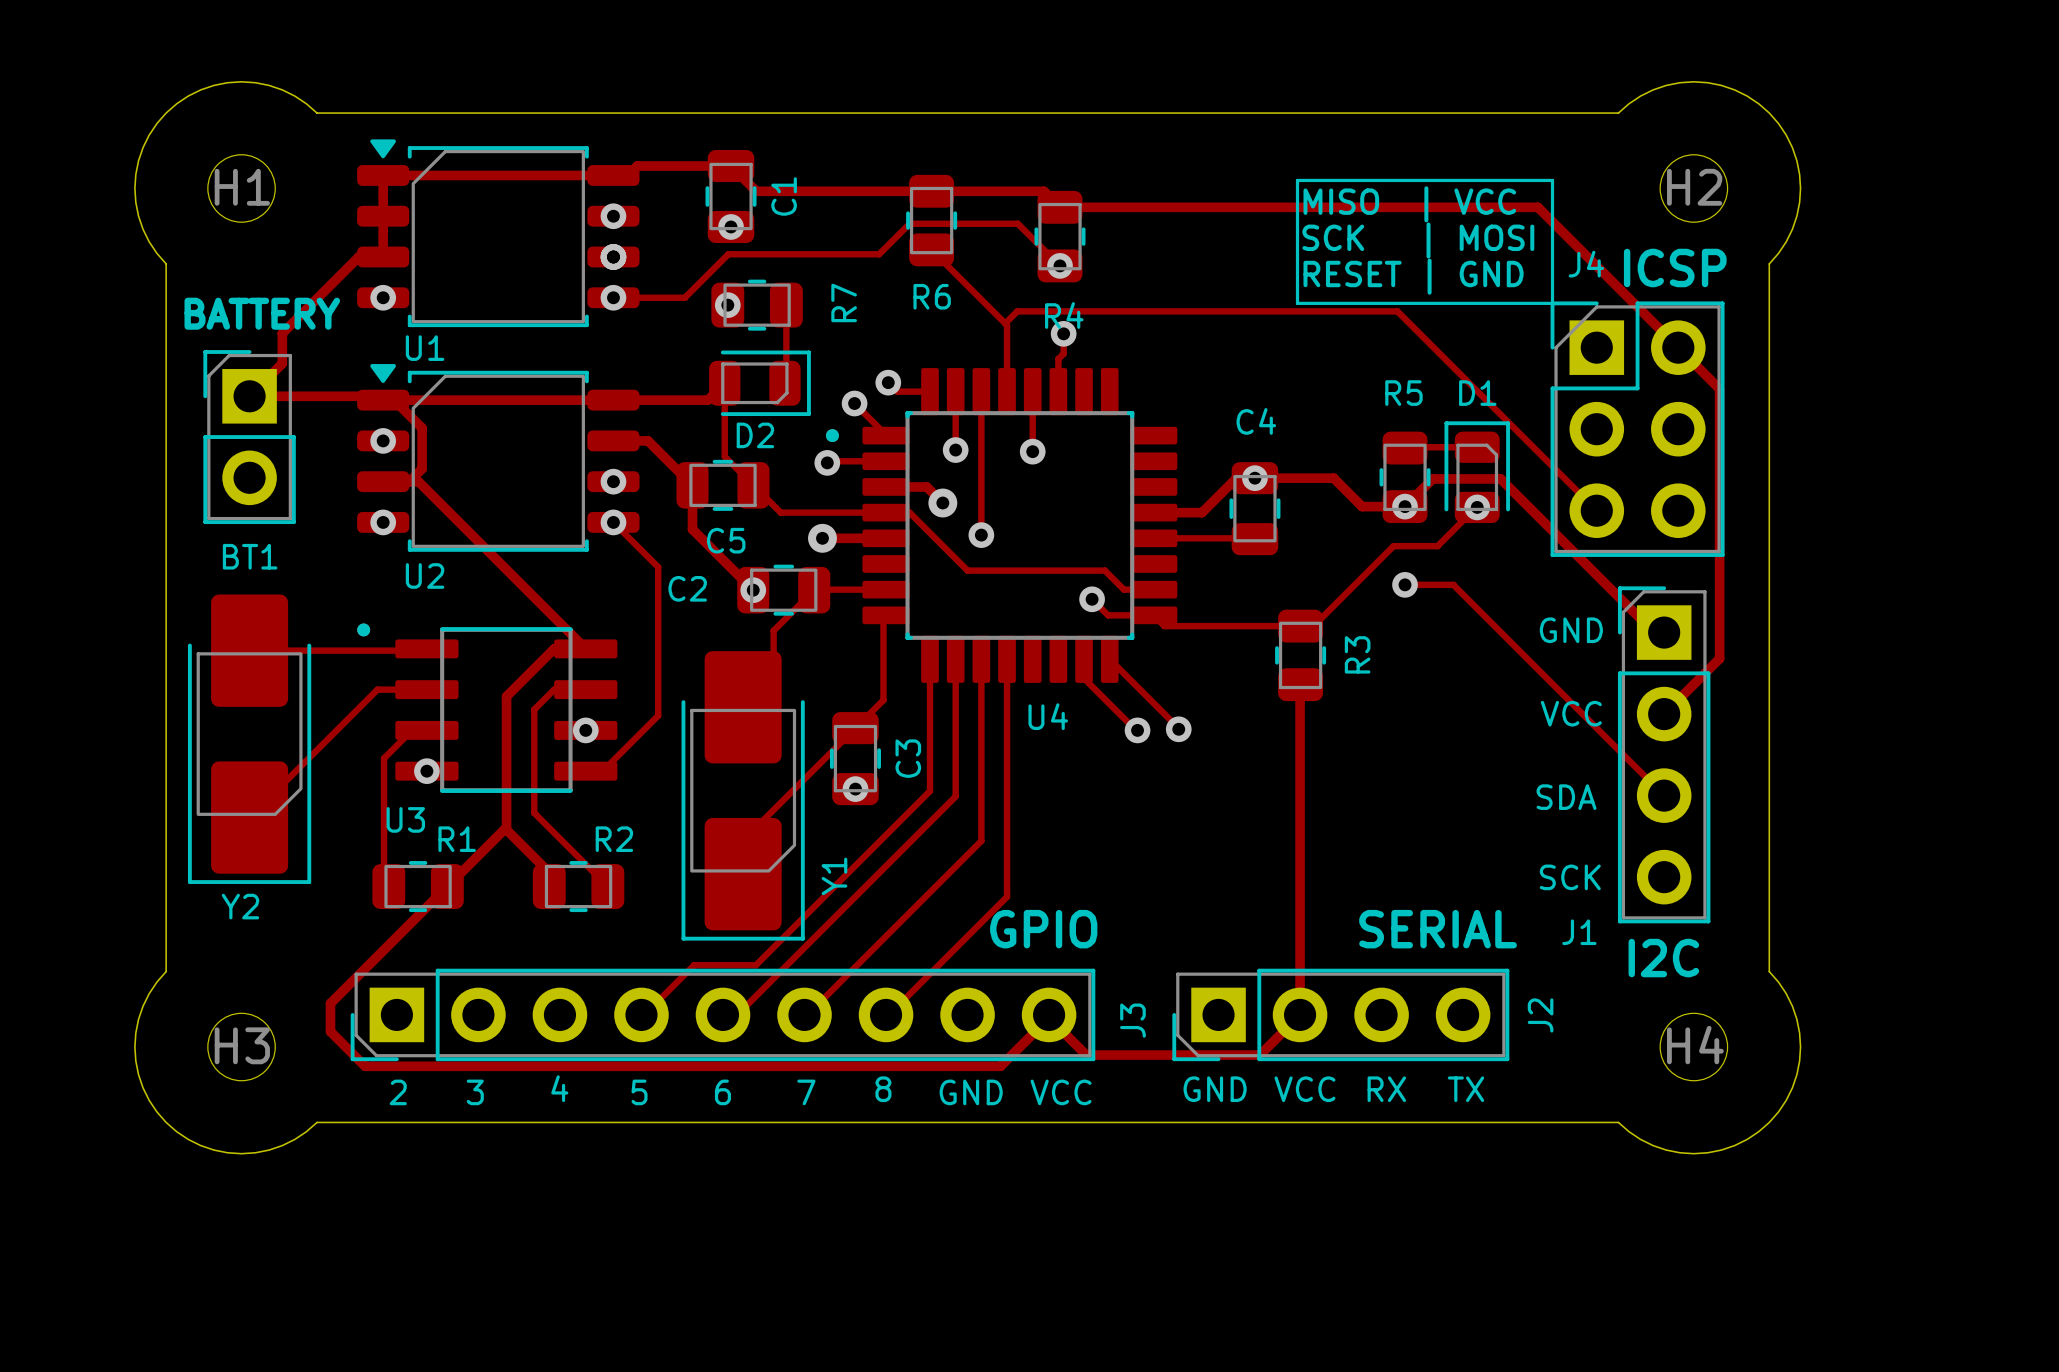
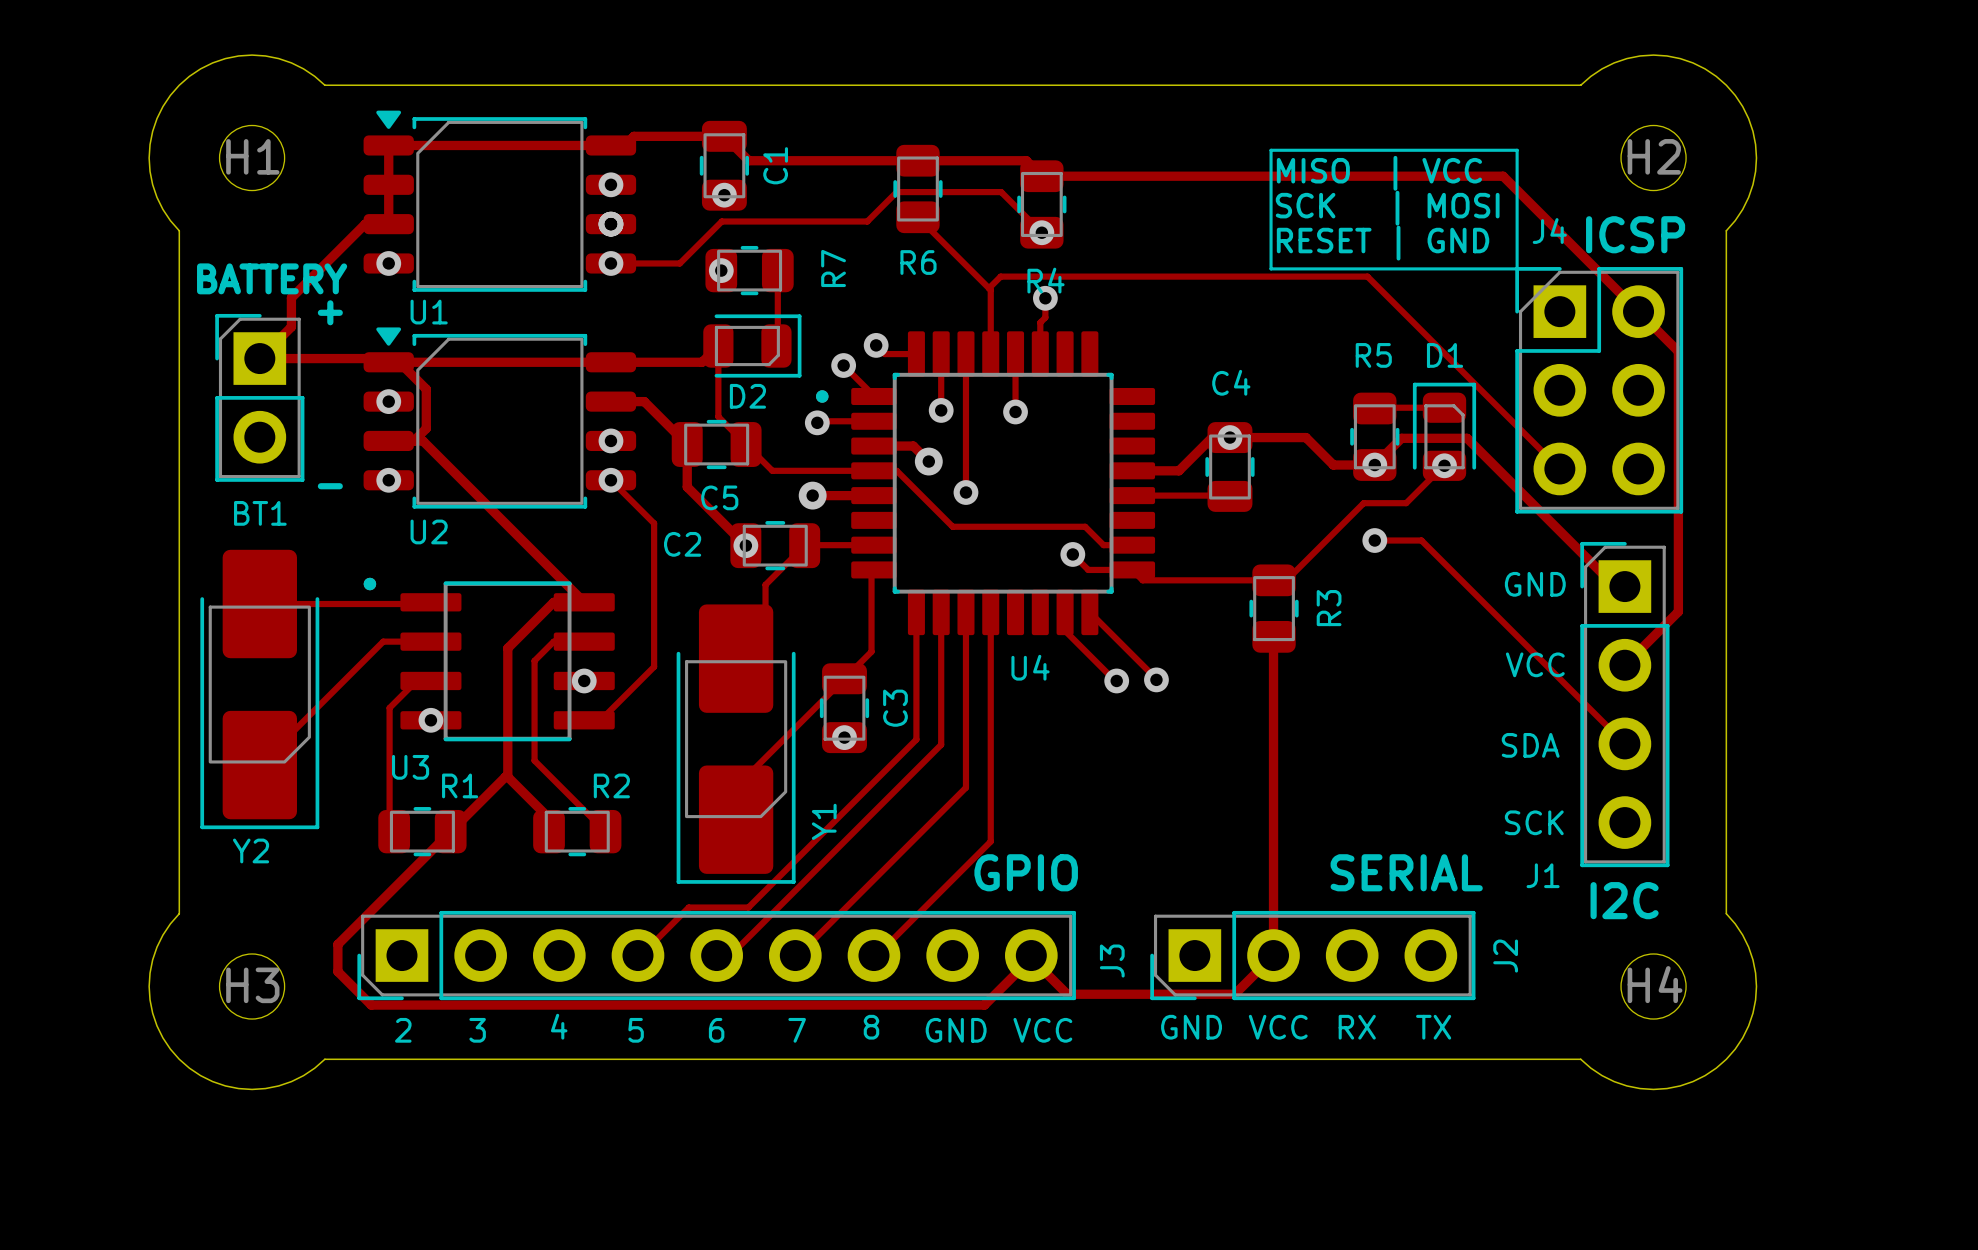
text: none -> + (330, 312)
text: none -> - (330, 486)

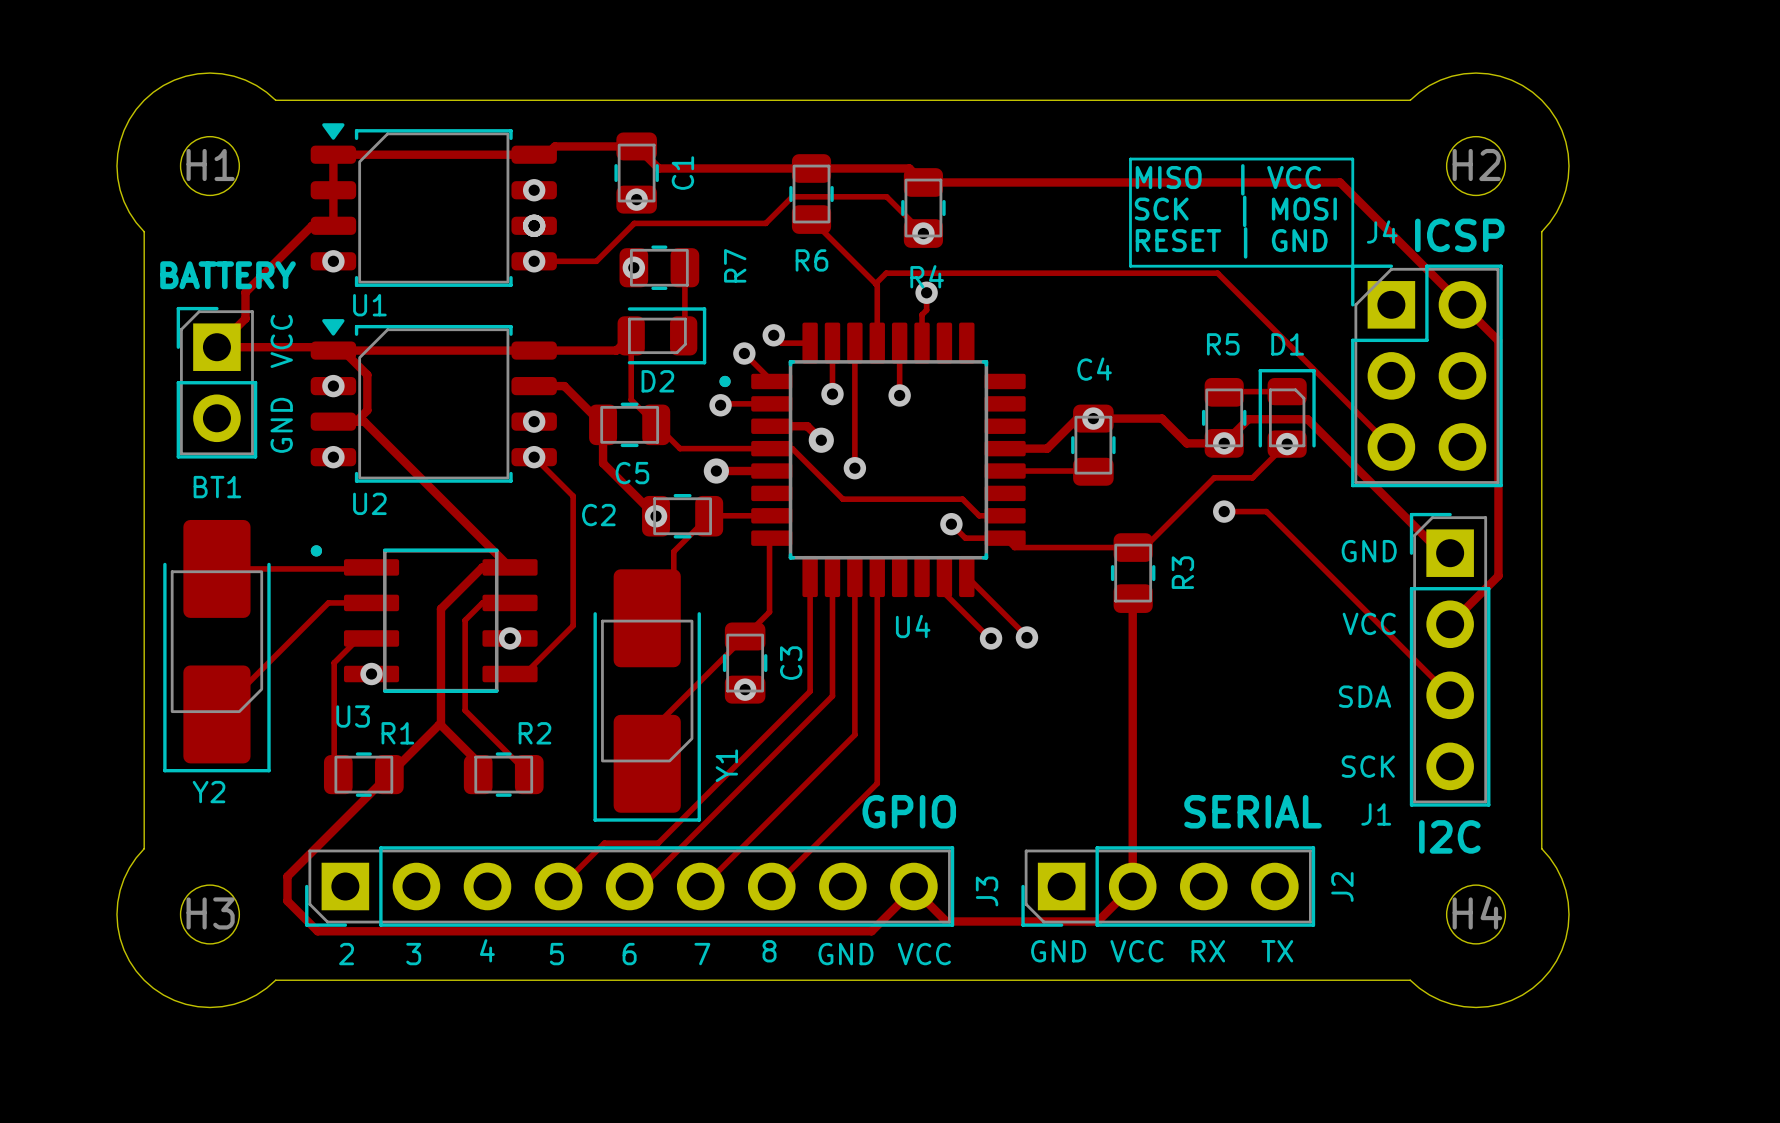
text: + (330, 312) -> none
text: none -> VCC (281, 341)
text: none -> GND (281, 425)
text: - (330, 486) -> none

